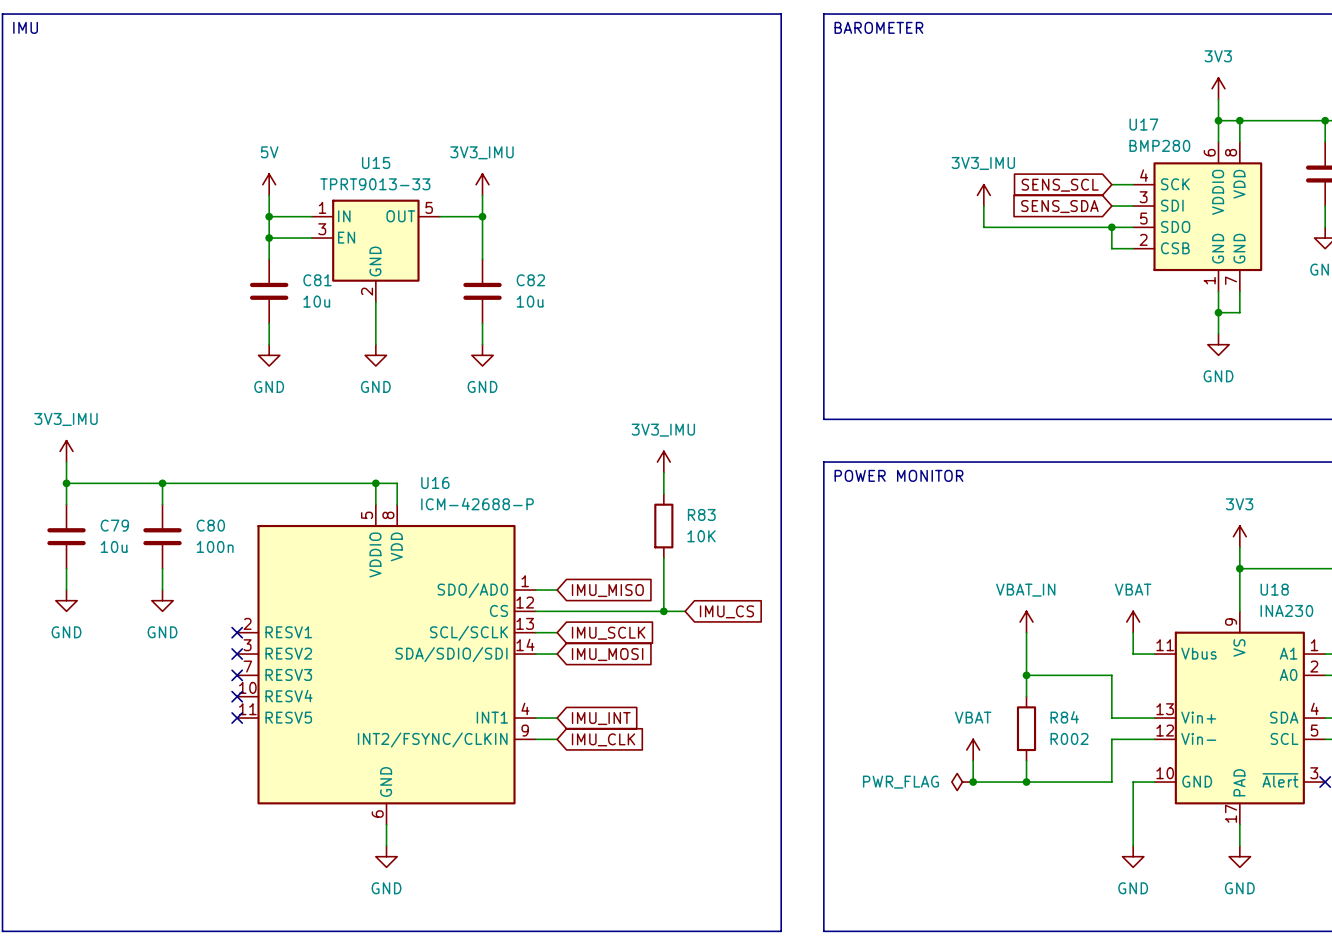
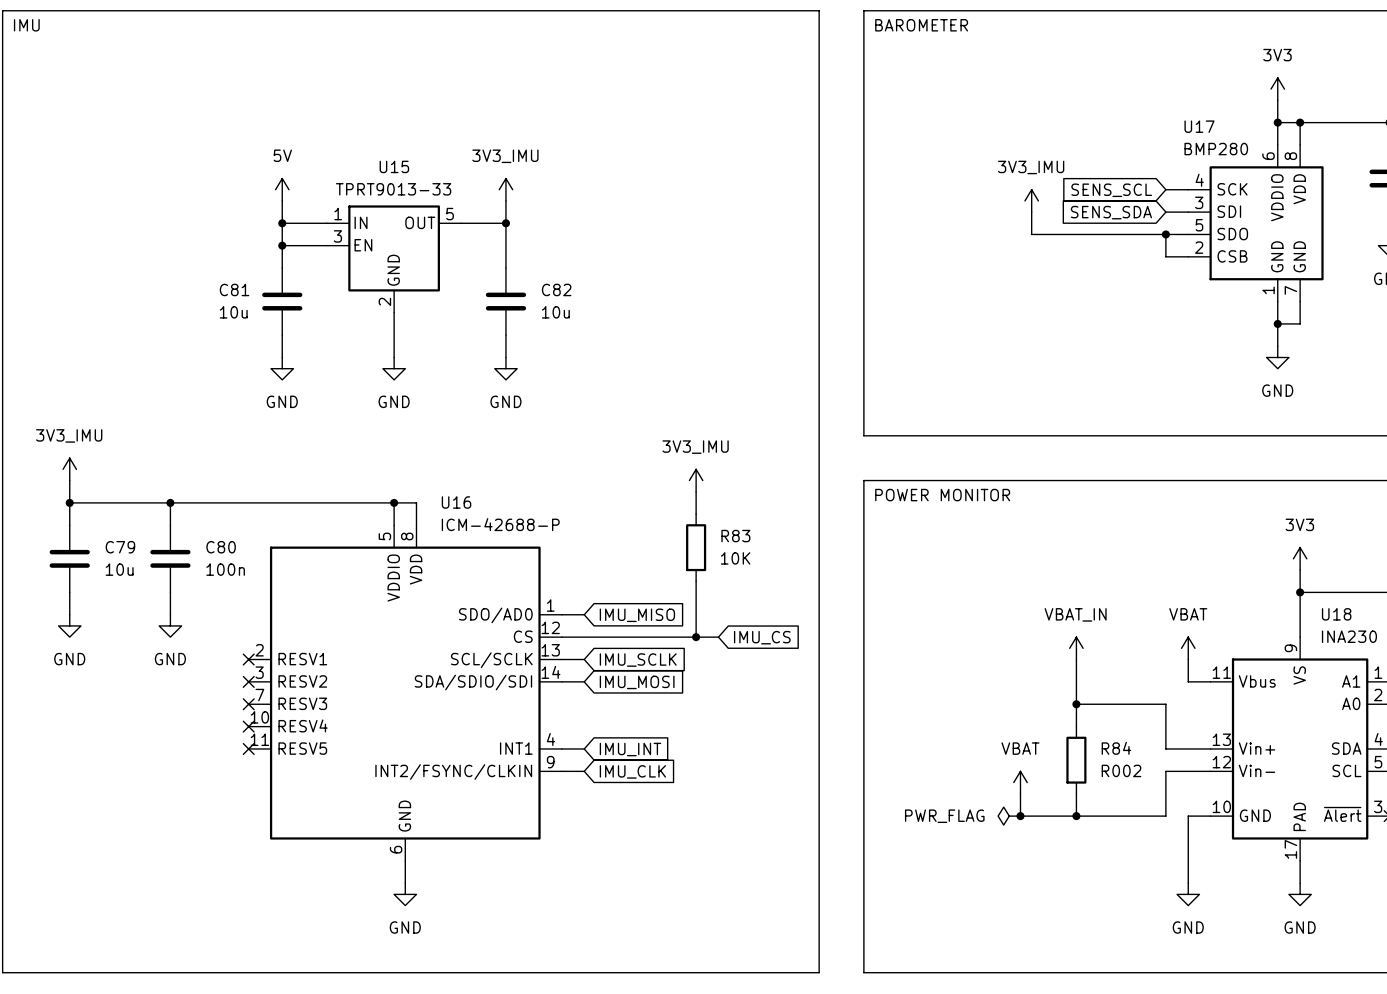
C81 name position: C81 (317, 280) -> C81 (234, 289)
C81 value position: 10u (316, 301) -> 10u (233, 312)

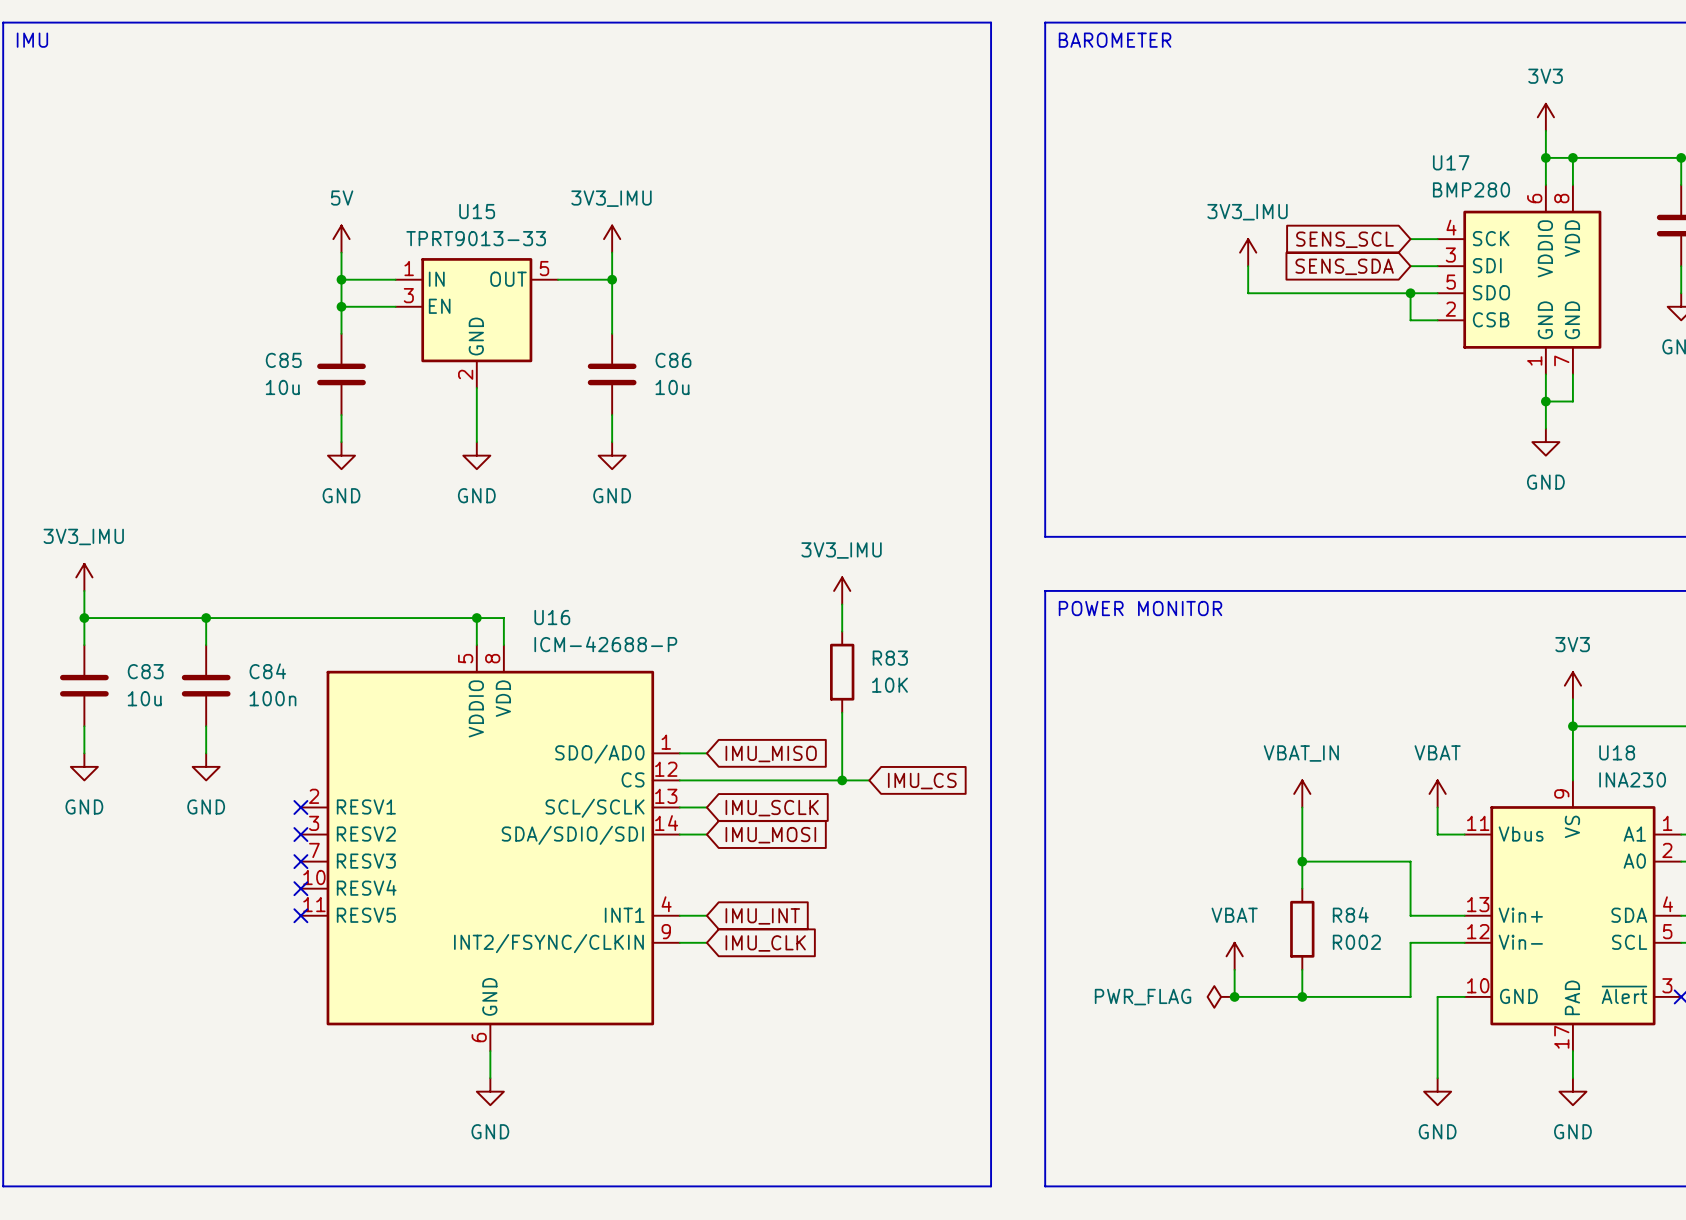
C81 name: C81 (234, 289) -> C85 (283, 360)
C82 name: C82 (556, 289) -> C86 (673, 360)
C79 name: C79 (120, 547) -> C83 (145, 671)
C80 name: C80 (221, 547) -> C84 (267, 671)

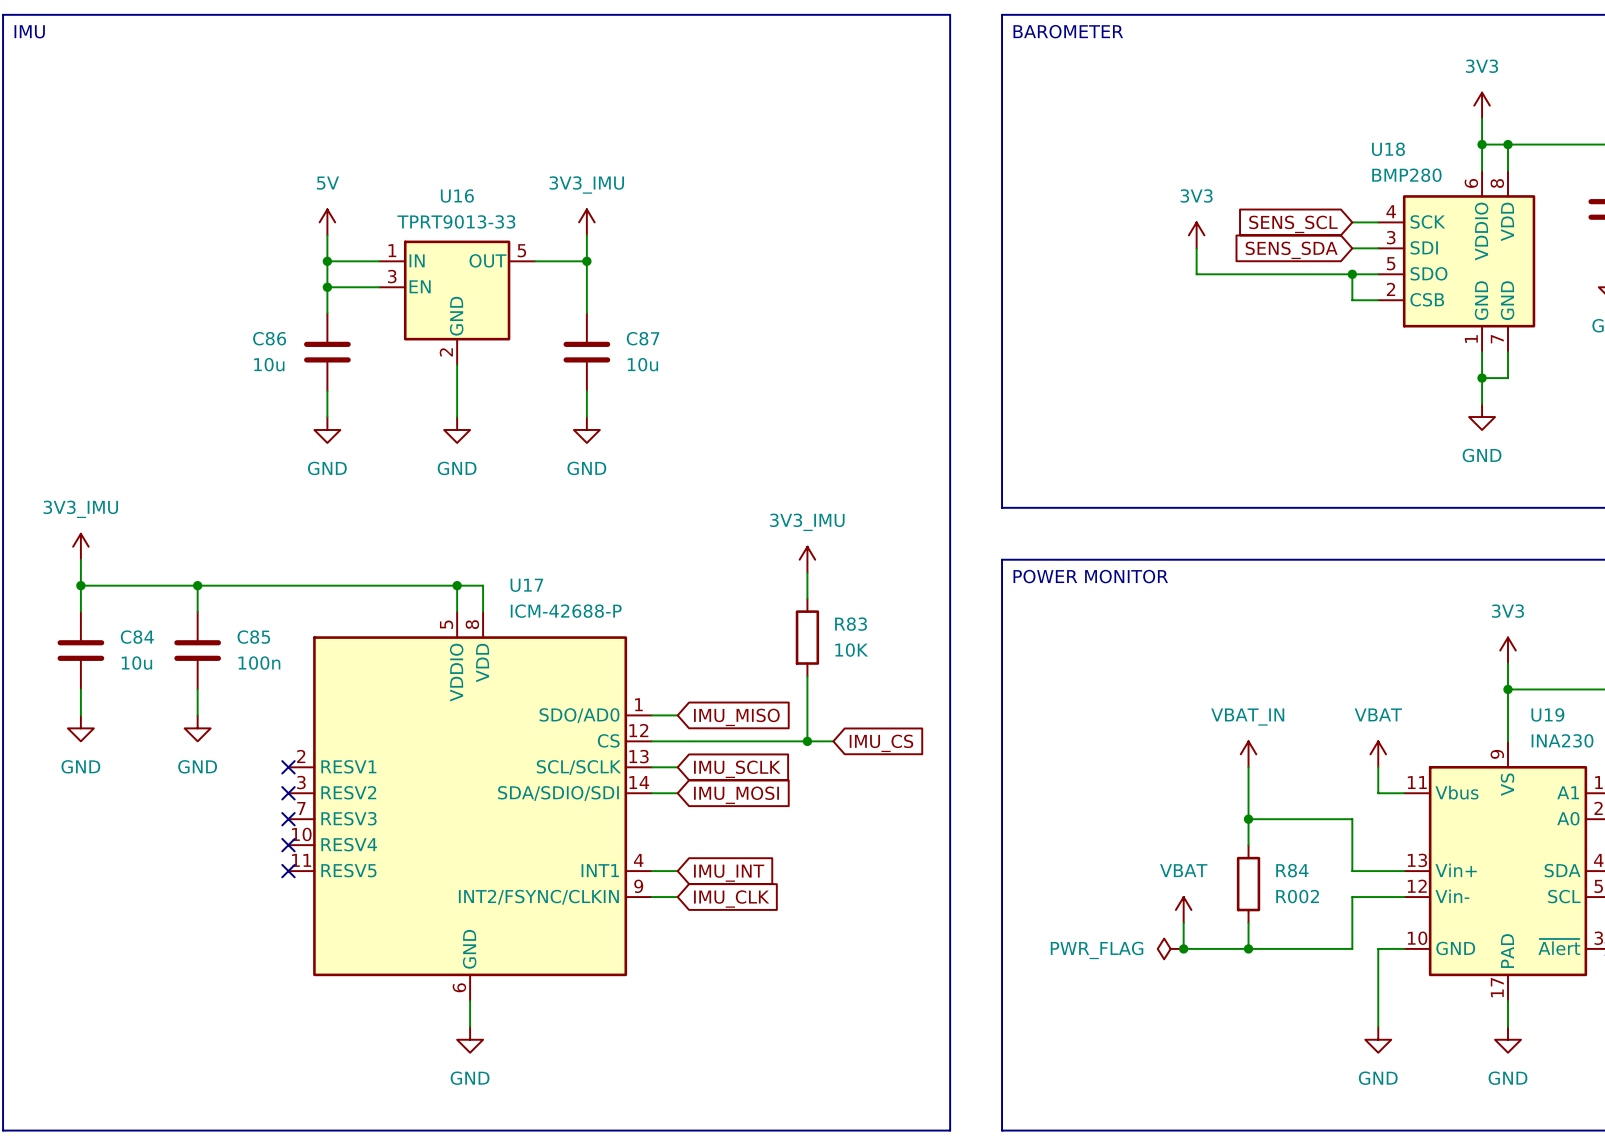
U17 name: U17 (1451, 162) -> U18 (1388, 149)
U15 name: U15 (477, 211) -> U16 (457, 195)
power symbol: 3V3_IMU (1248, 252) -> 3V3 (1196, 235)
C85 name: C85 (283, 360) -> C86 (269, 338)
C86 name: C86 (673, 360) -> C87 (643, 338)
U16 name: U16 (552, 617) -> U17 (526, 585)
C83 name: C83 (145, 671) -> C84 (137, 637)
C84 name: C84 (267, 671) -> C85 (253, 637)
U18 name: U18 (1617, 752) -> U19 (1547, 714)

